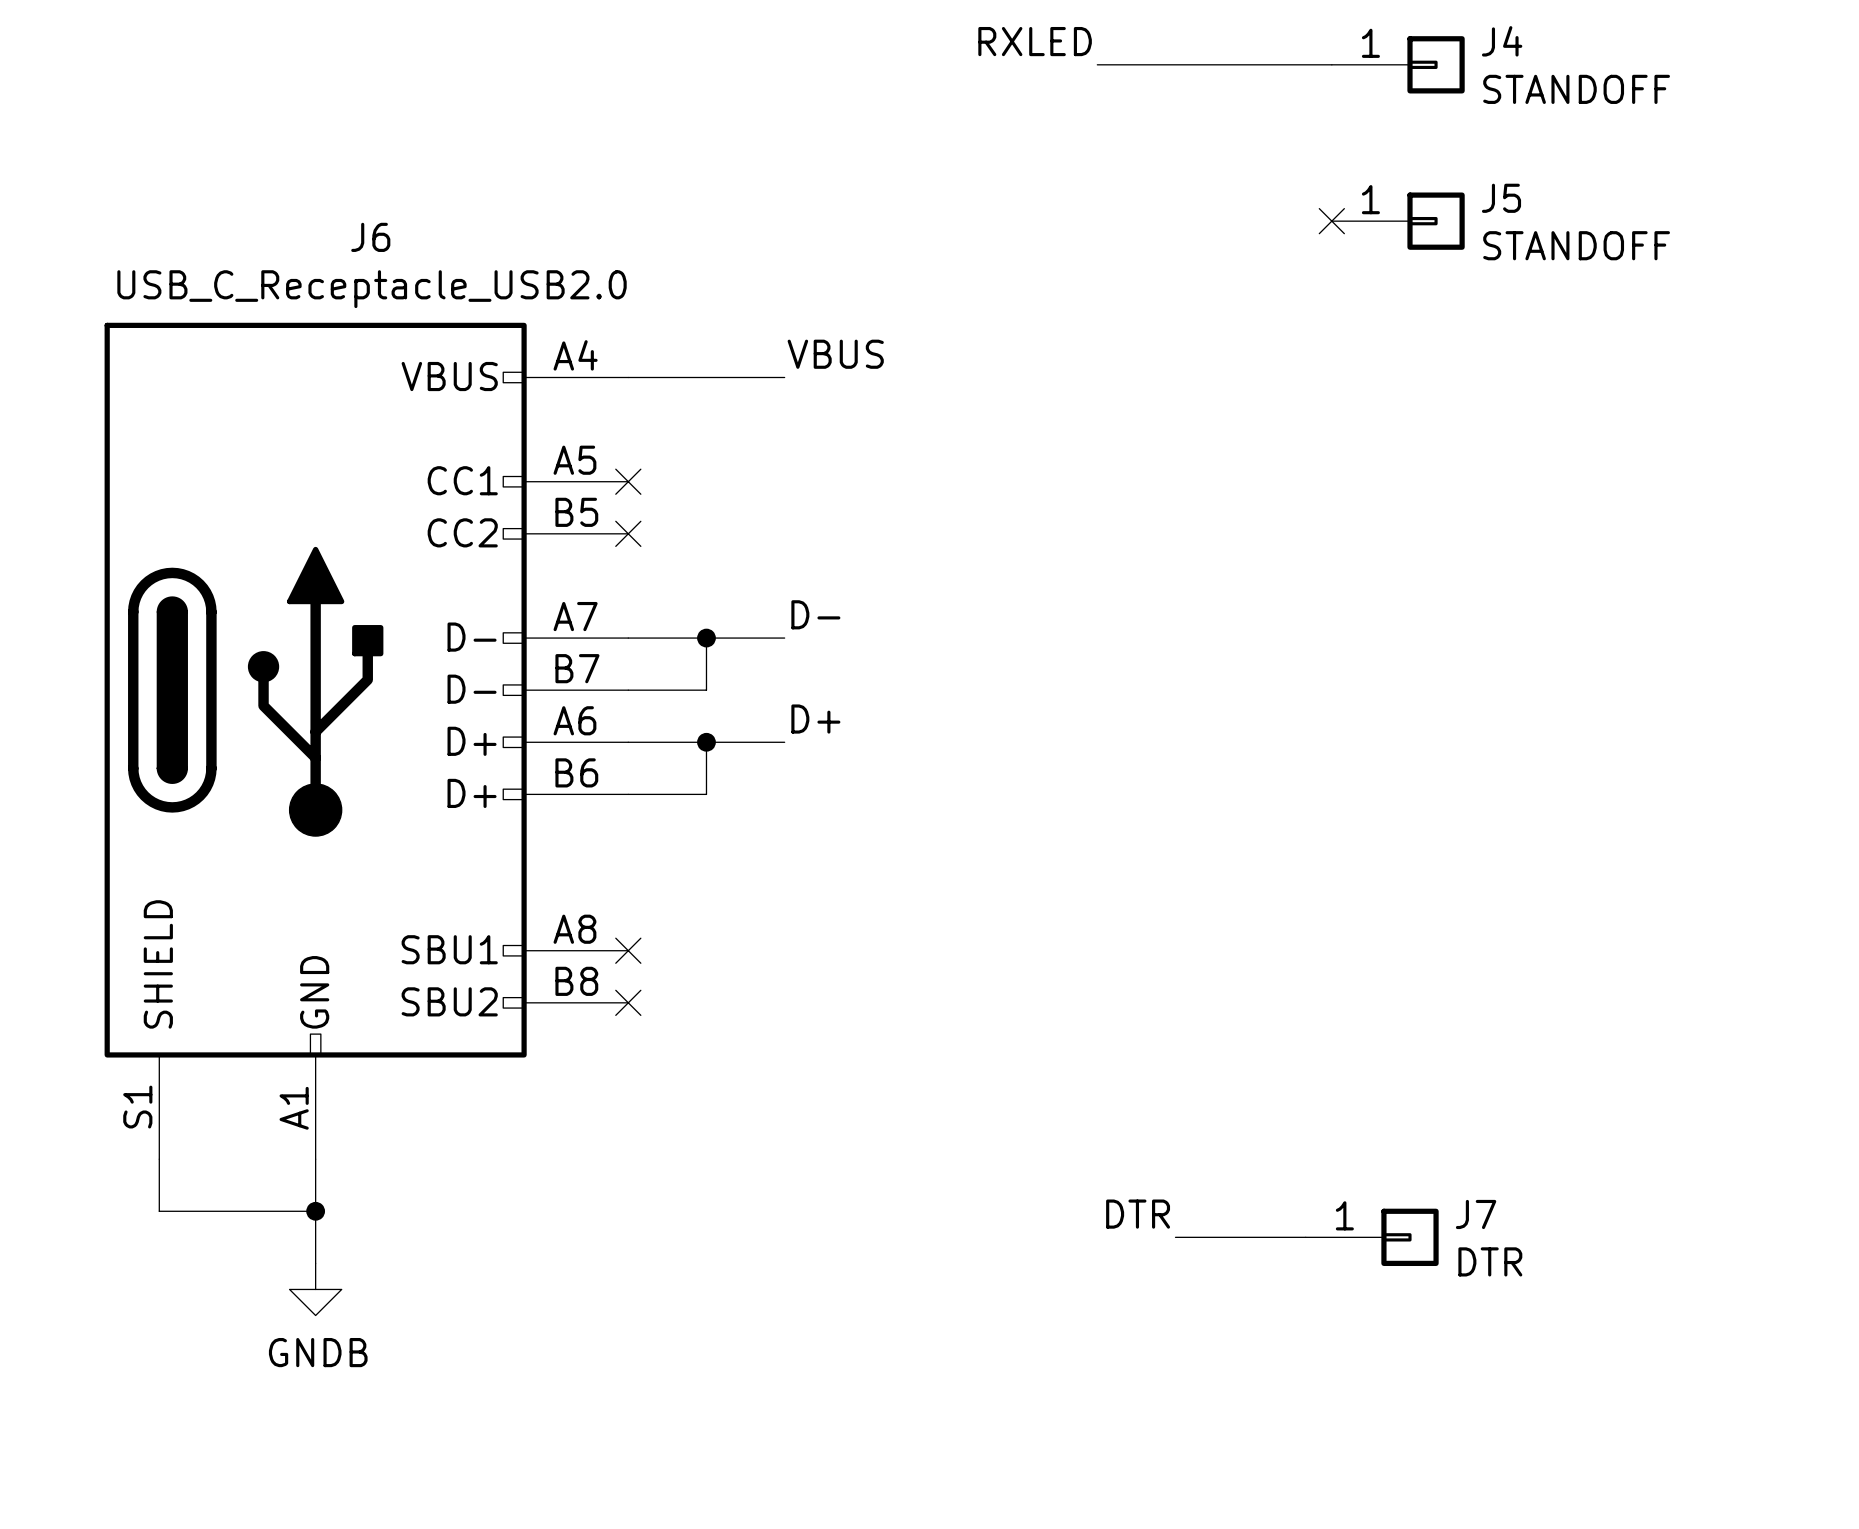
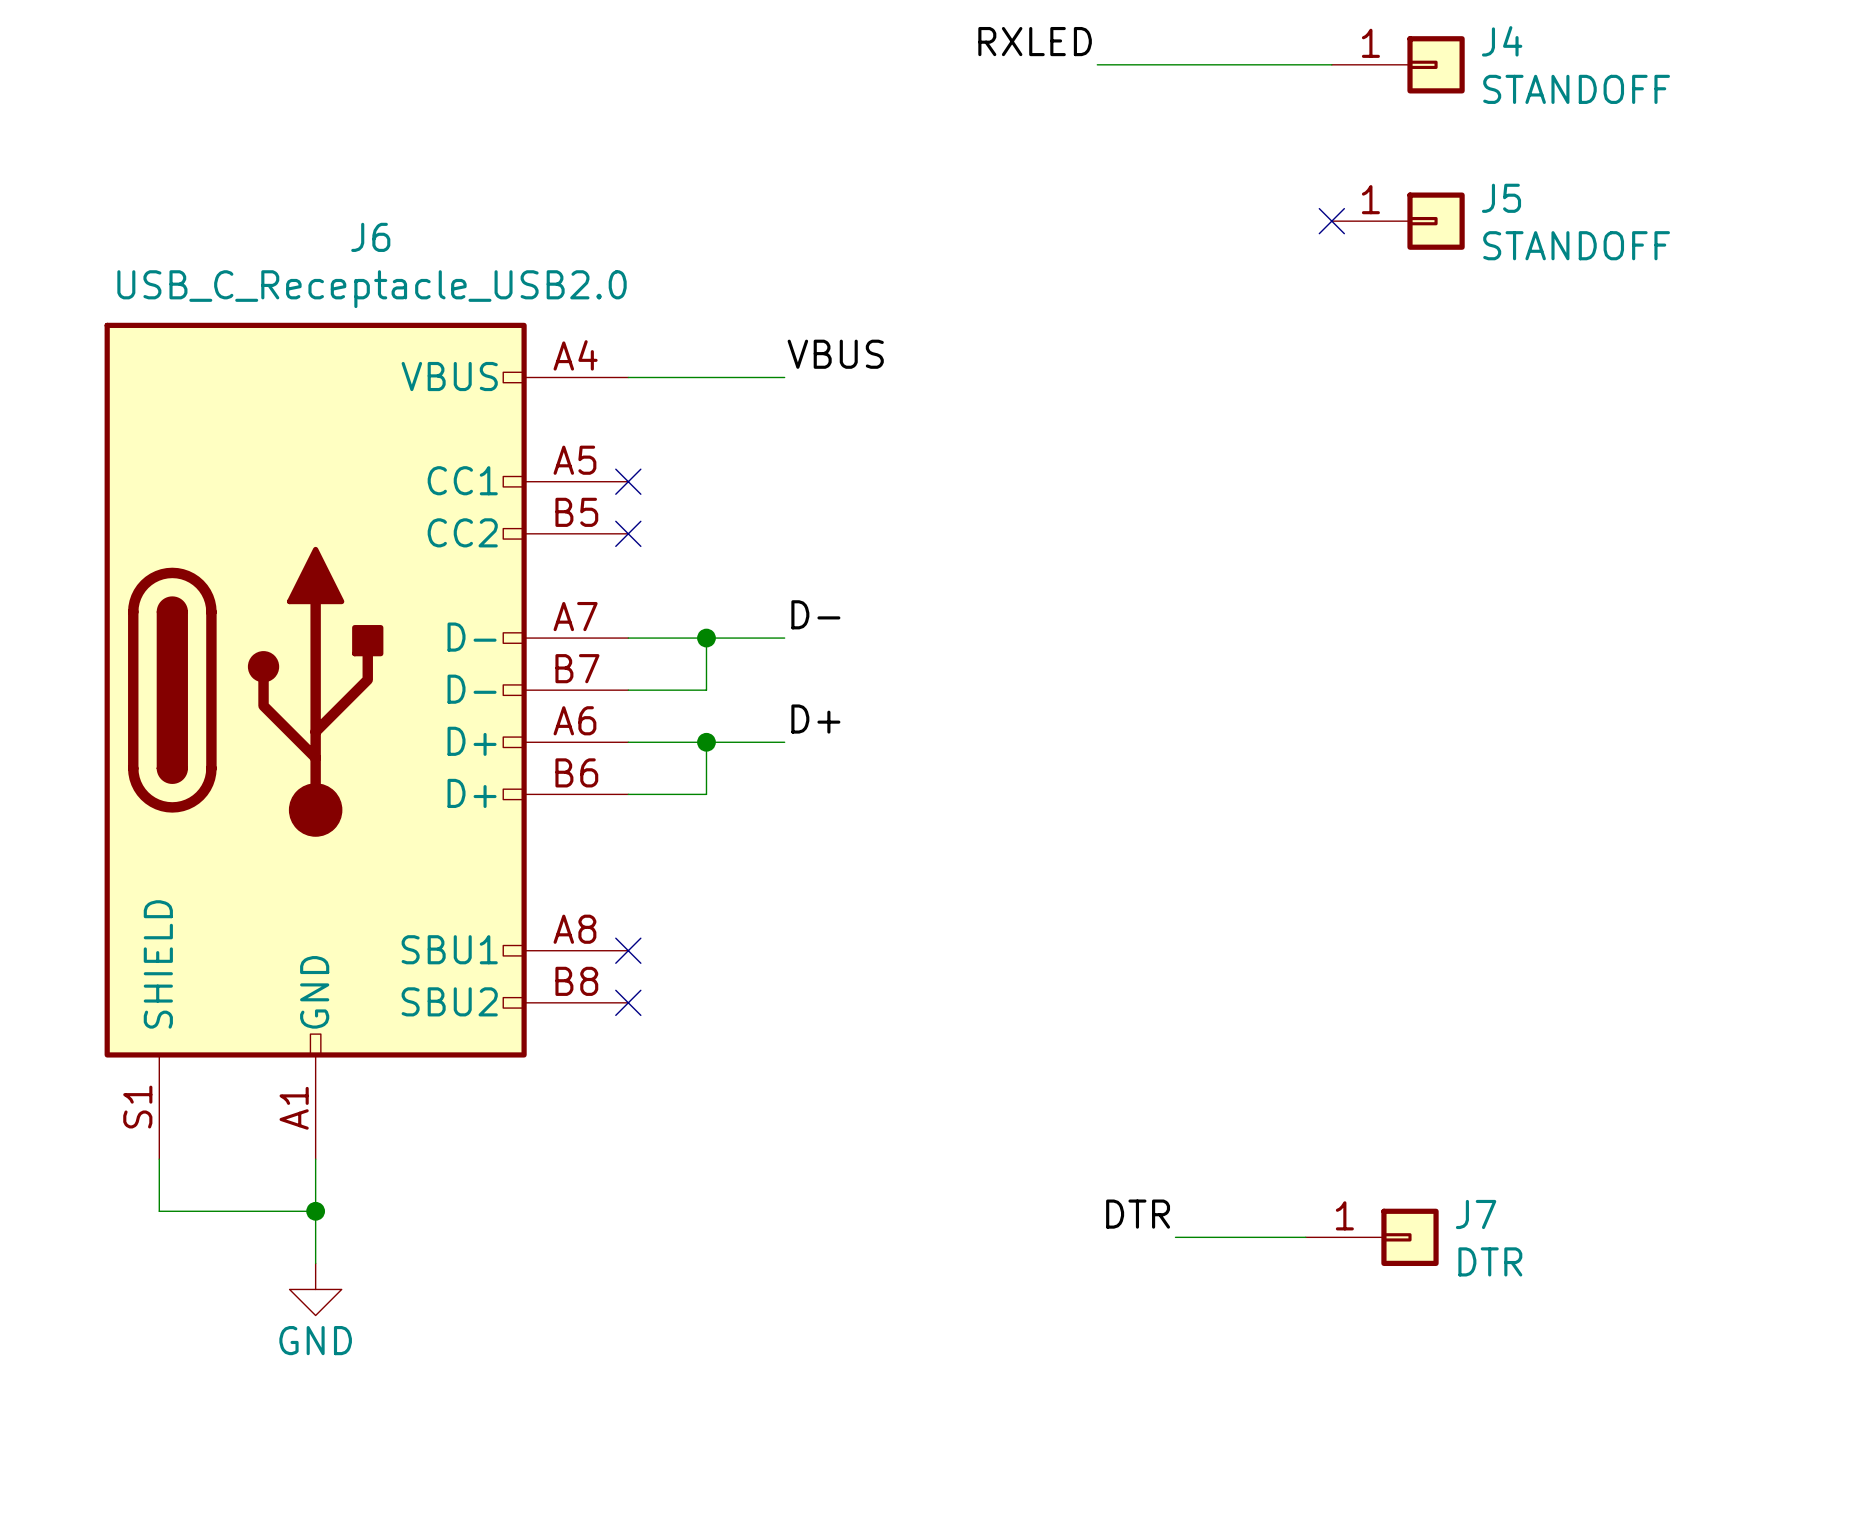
power symbol: GNDB (315, 1289) -> GND (315, 1289)

